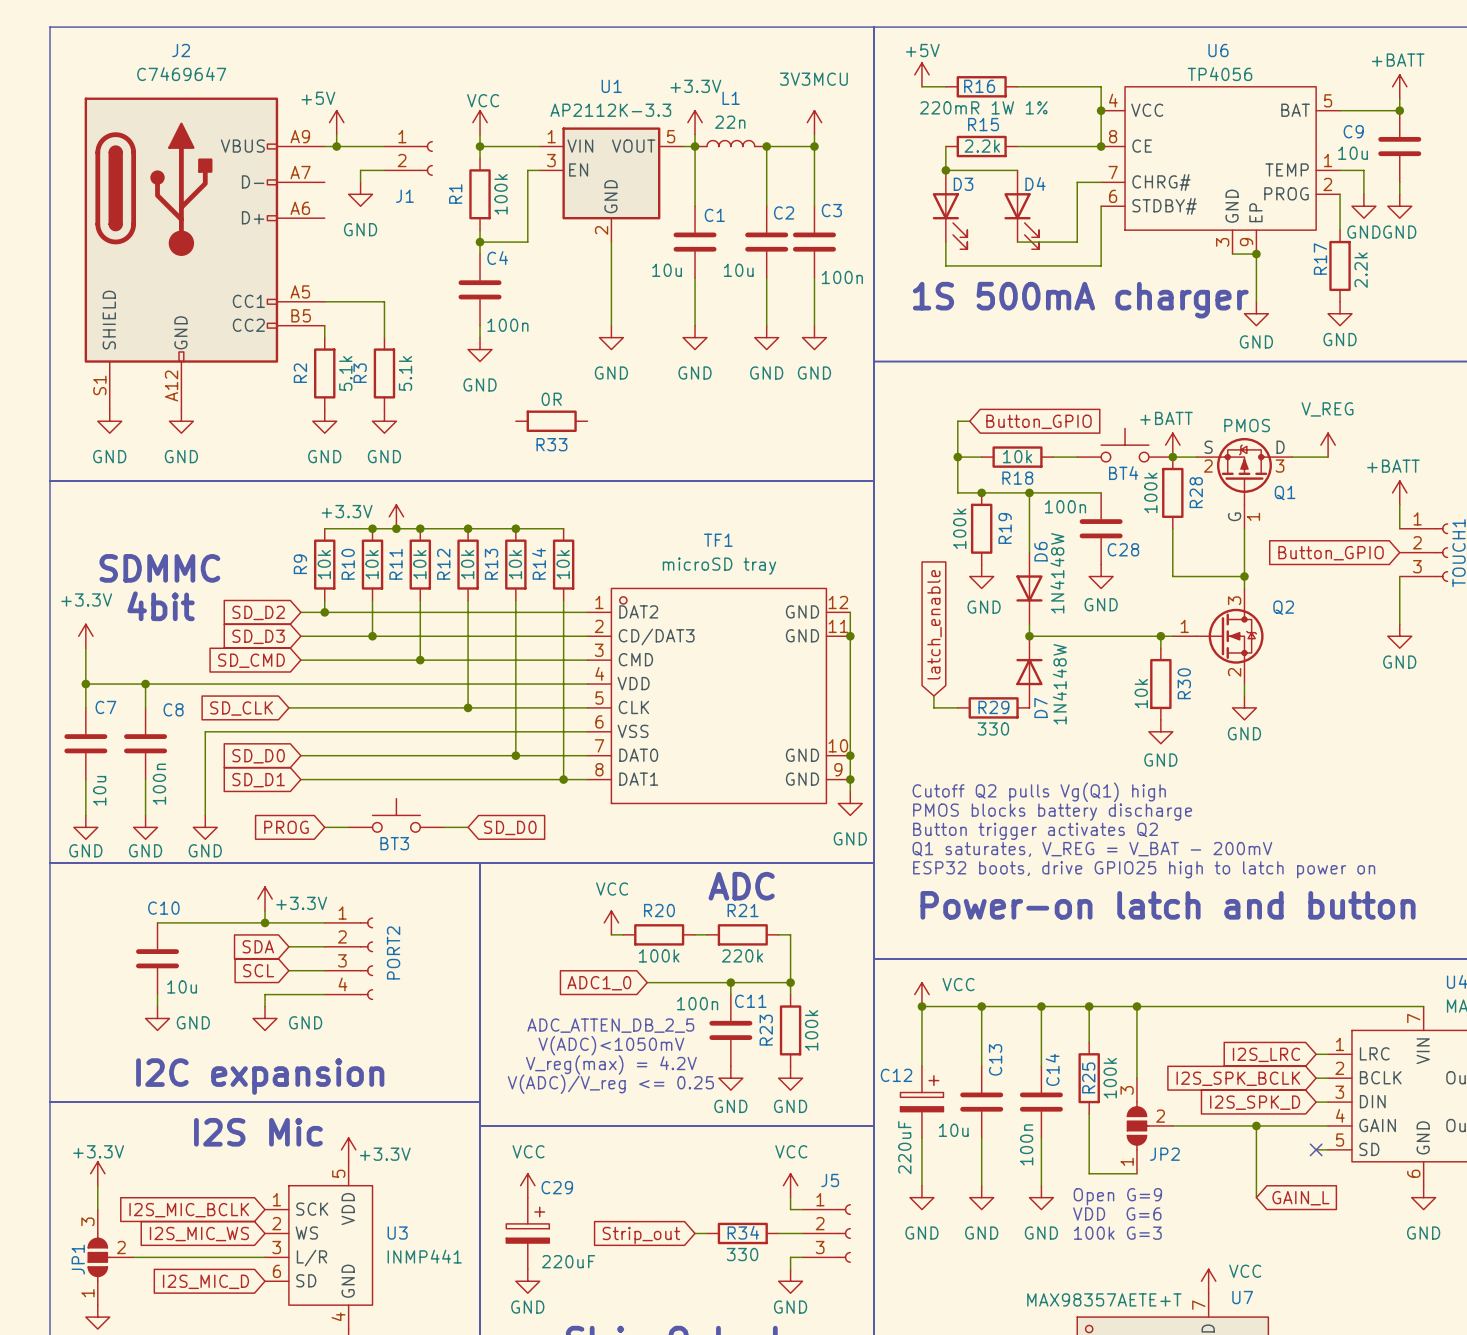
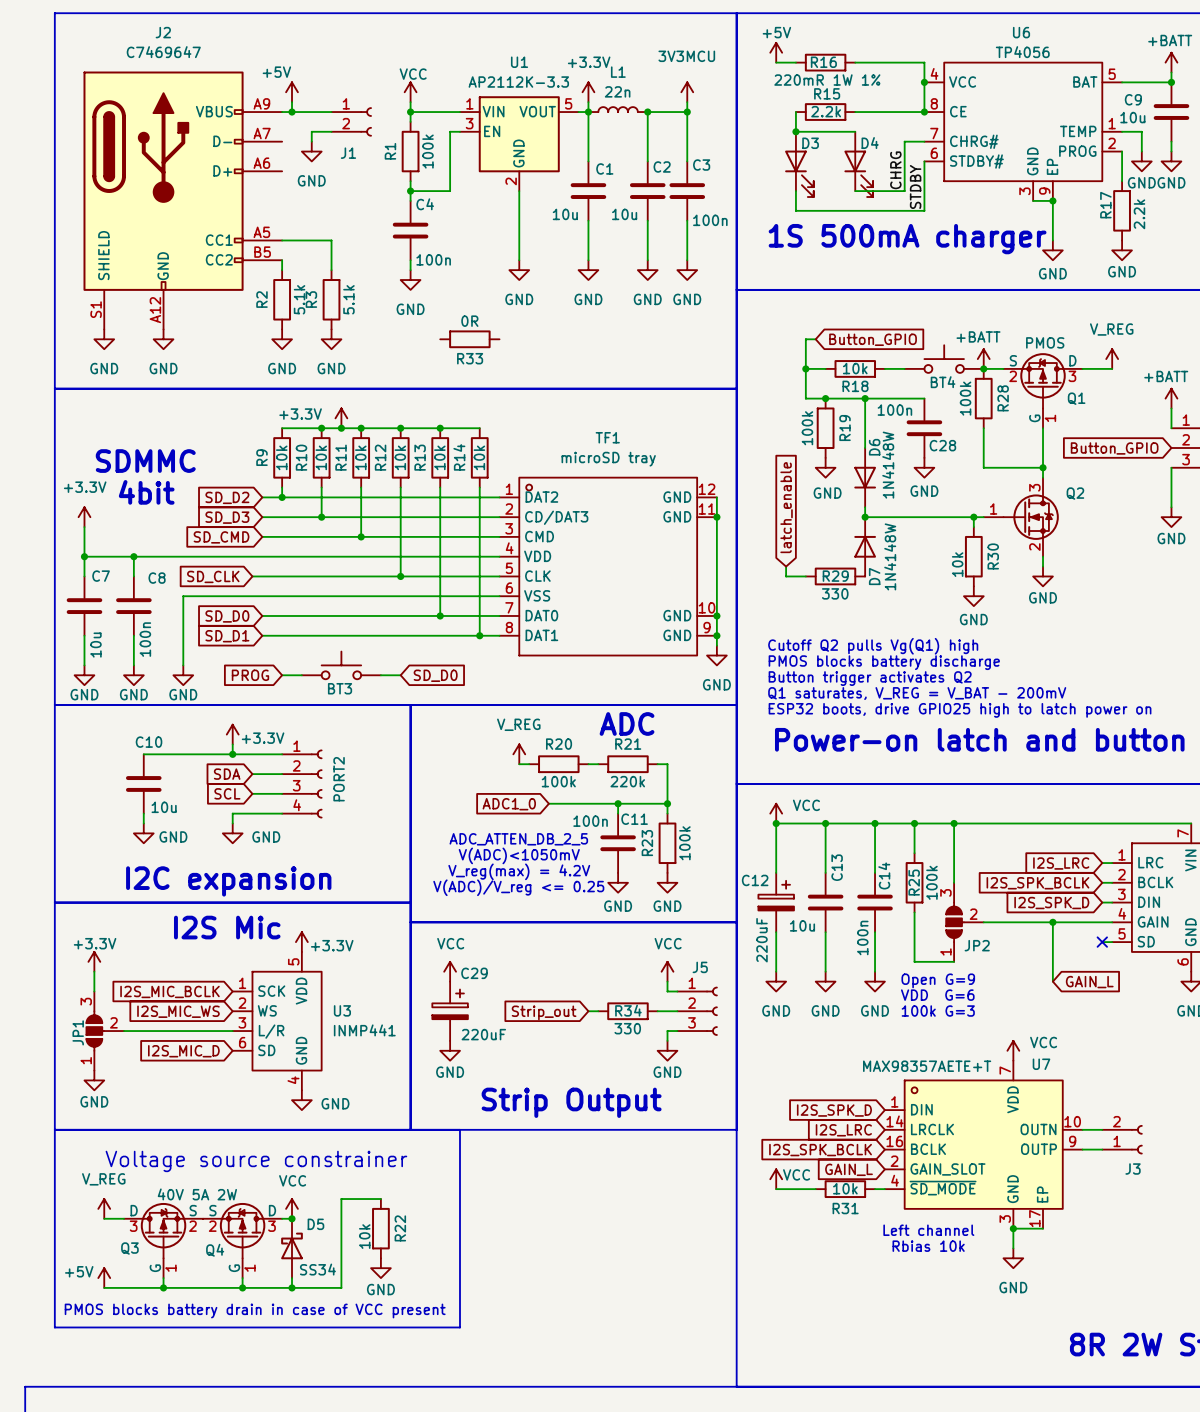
label: none -> CHRG (895, 170)
label: none -> STDBY (915, 187)
power symbol: VCC (611, 922) -> V_REG (519, 754)

